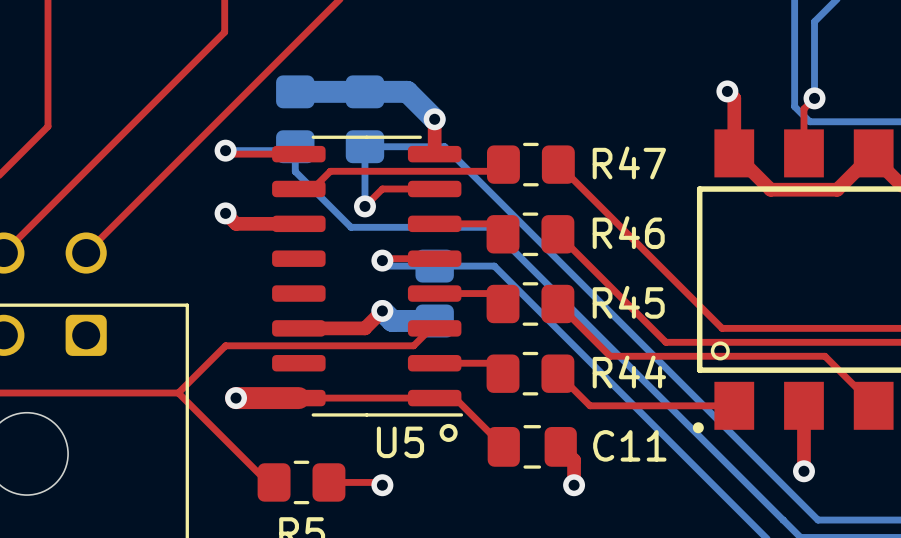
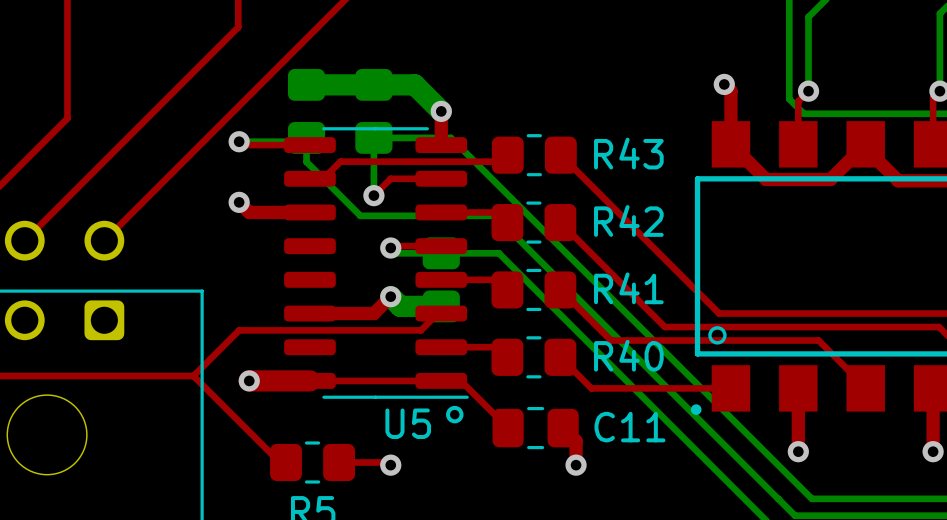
R47 name: R47 (629, 162) -> R43 (628, 153)
R46 name: R46 (628, 232) -> R42 (628, 220)
R45 name: R45 (628, 302) -> R41 (628, 288)
R44 name: R44 (629, 372) -> R40 (628, 355)

